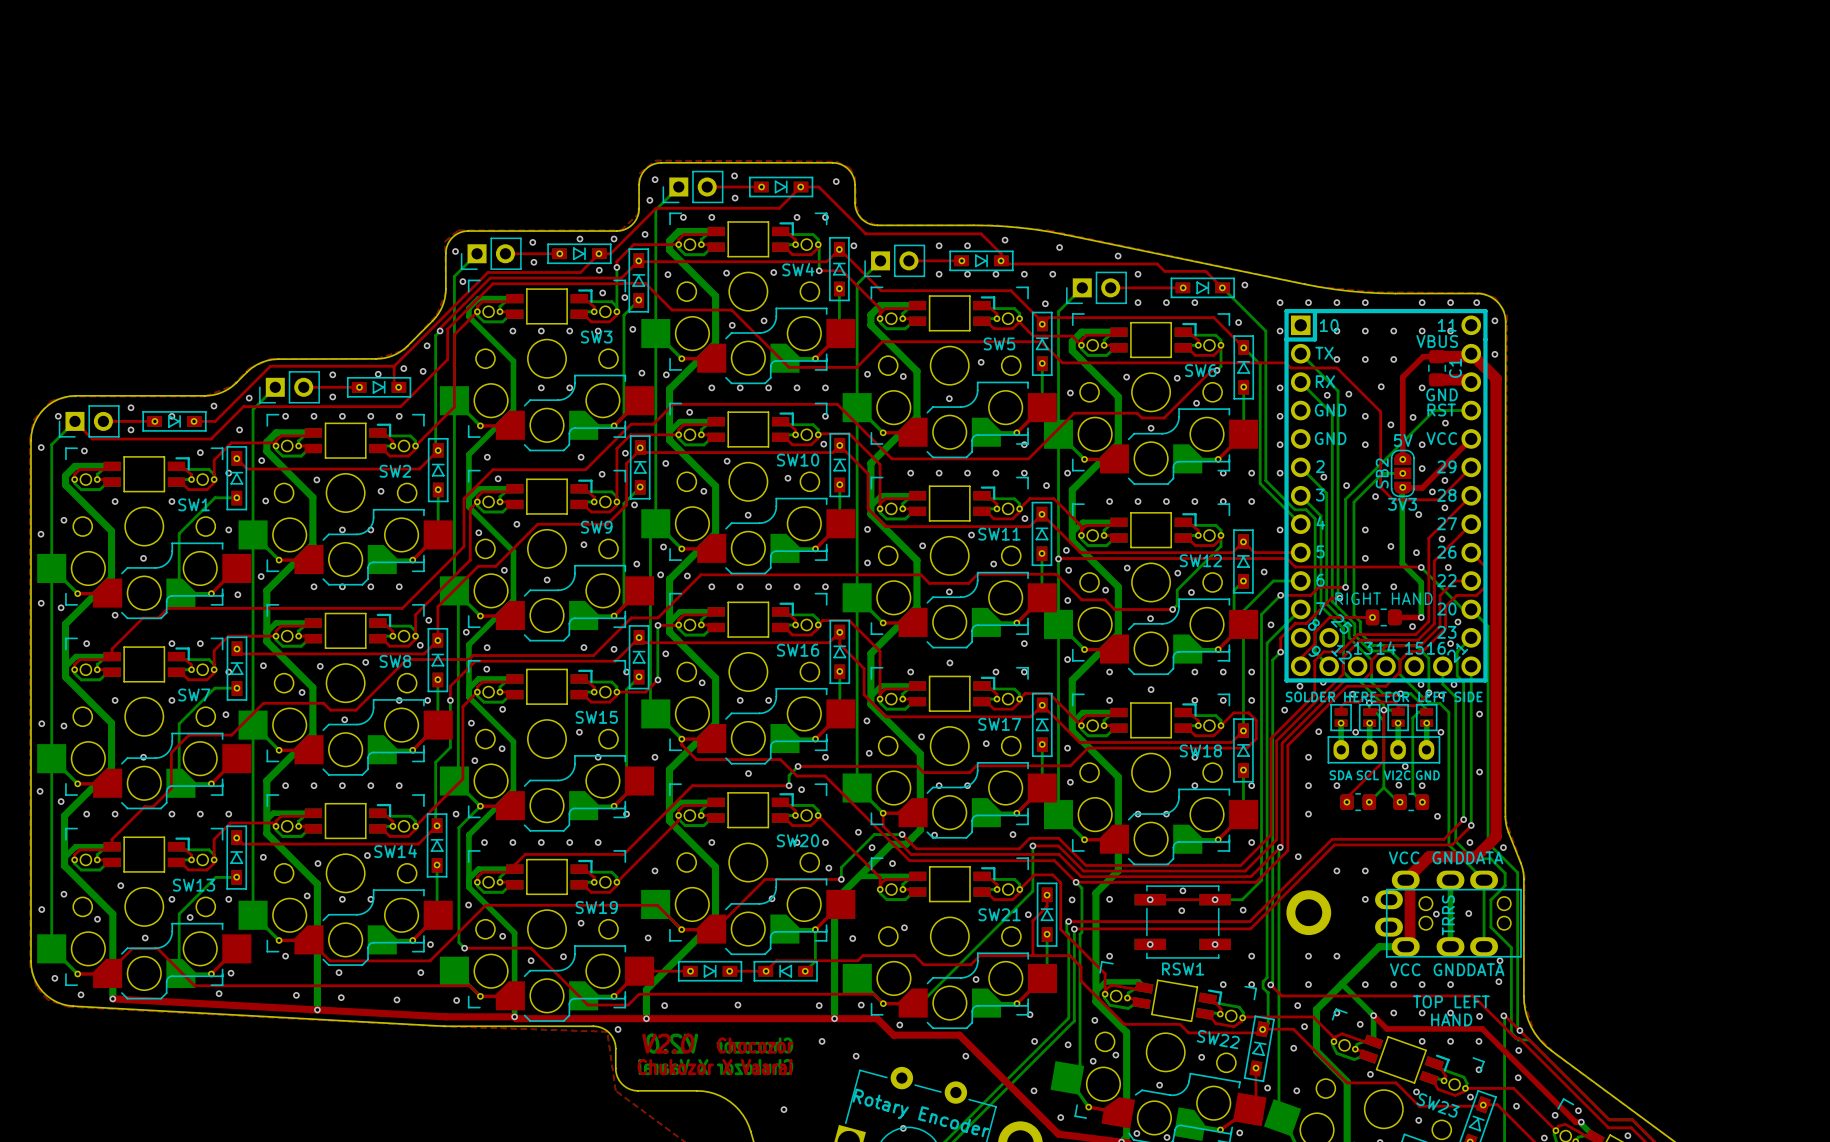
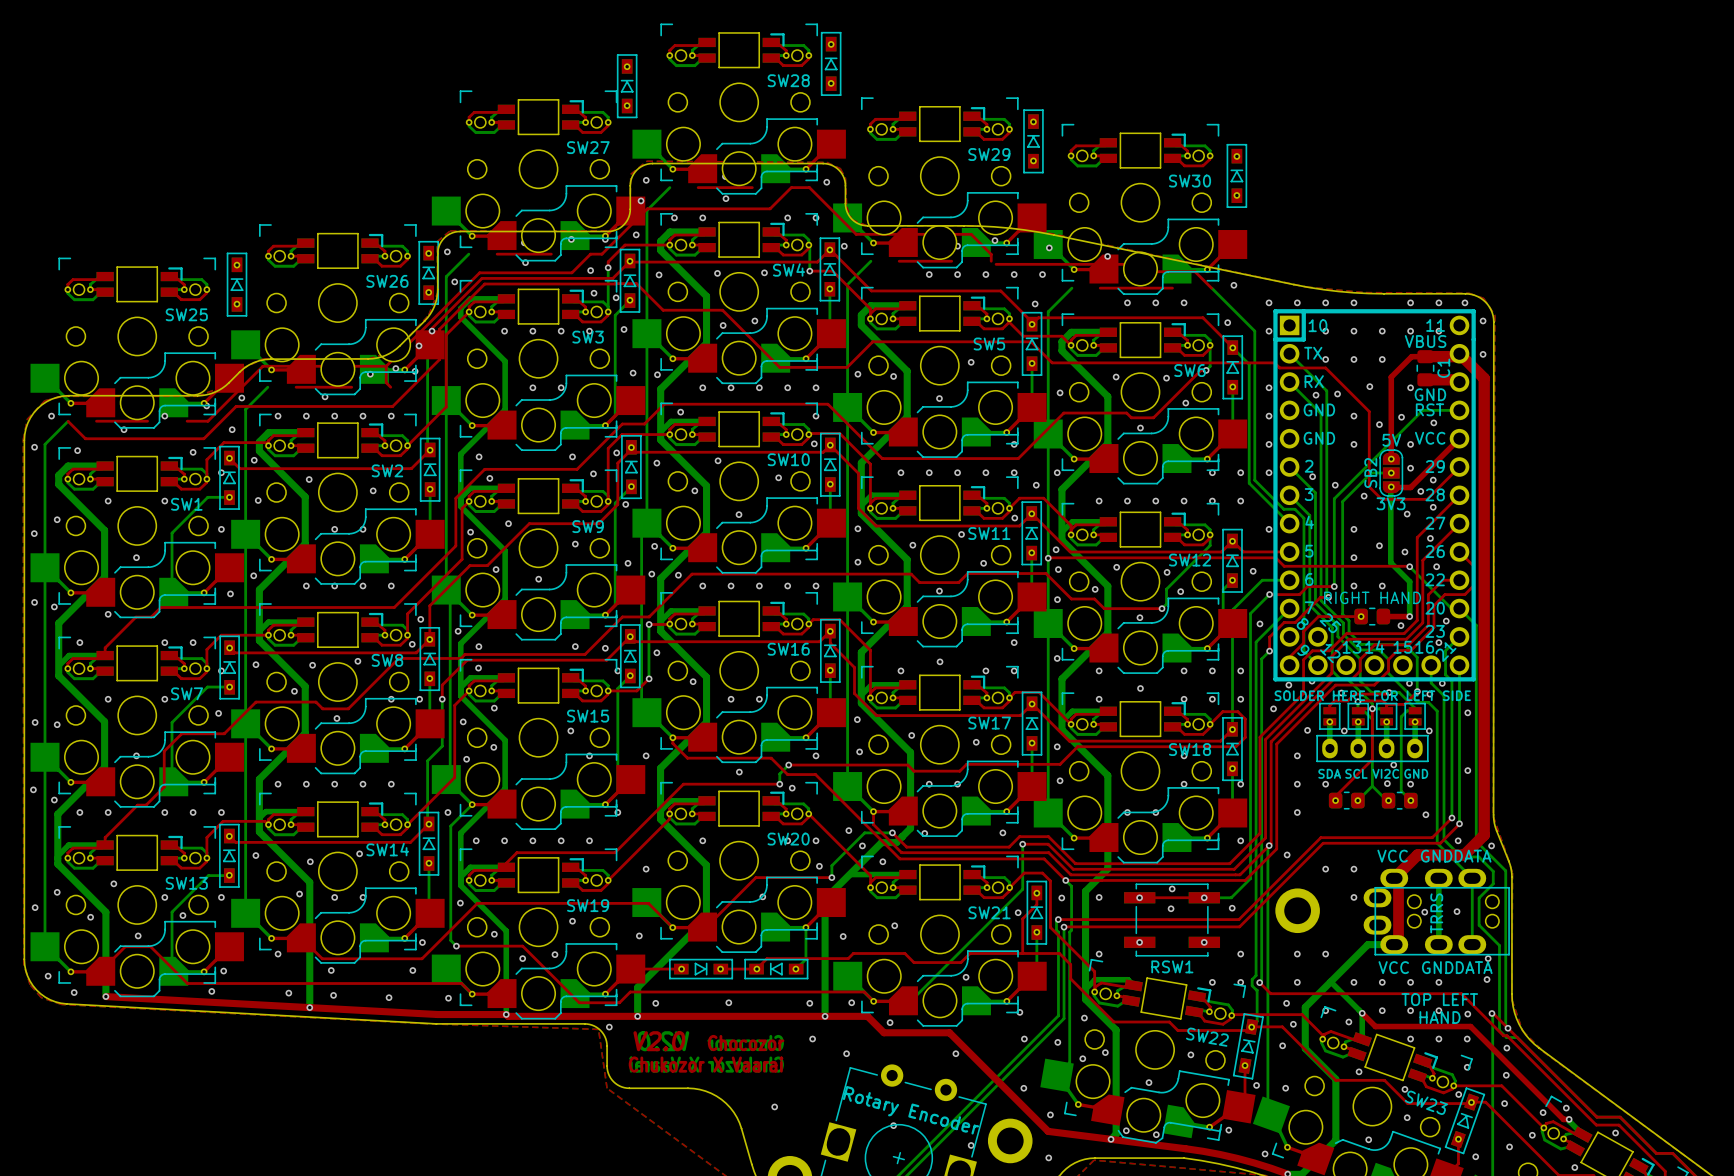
part: none -> (831, 63)
part: none -> (627, 86)
SW28: none -> (739, 109)
part: none -> (1033, 141)
SW27: none -> (538, 175)
part: none -> (1236, 175)
SW29: none -> (939, 182)
part: (693, 186) -> none
part: (781, 186) -> none
SW30: none -> (1140, 209)
part: (491, 253) -> none
part: (579, 253) -> none
part: (894, 260) -> none
part: (981, 260) -> none
part: none -> (428, 272)
part: none -> (237, 284)
part: (1096, 287) -> none
part: (1202, 287) -> none
SW26: none -> (337, 309)
SW25: none -> (137, 343)
part: (289, 387) -> none
part: (379, 387) -> none
part: (89, 421) -> none
part: (174, 421) -> none

